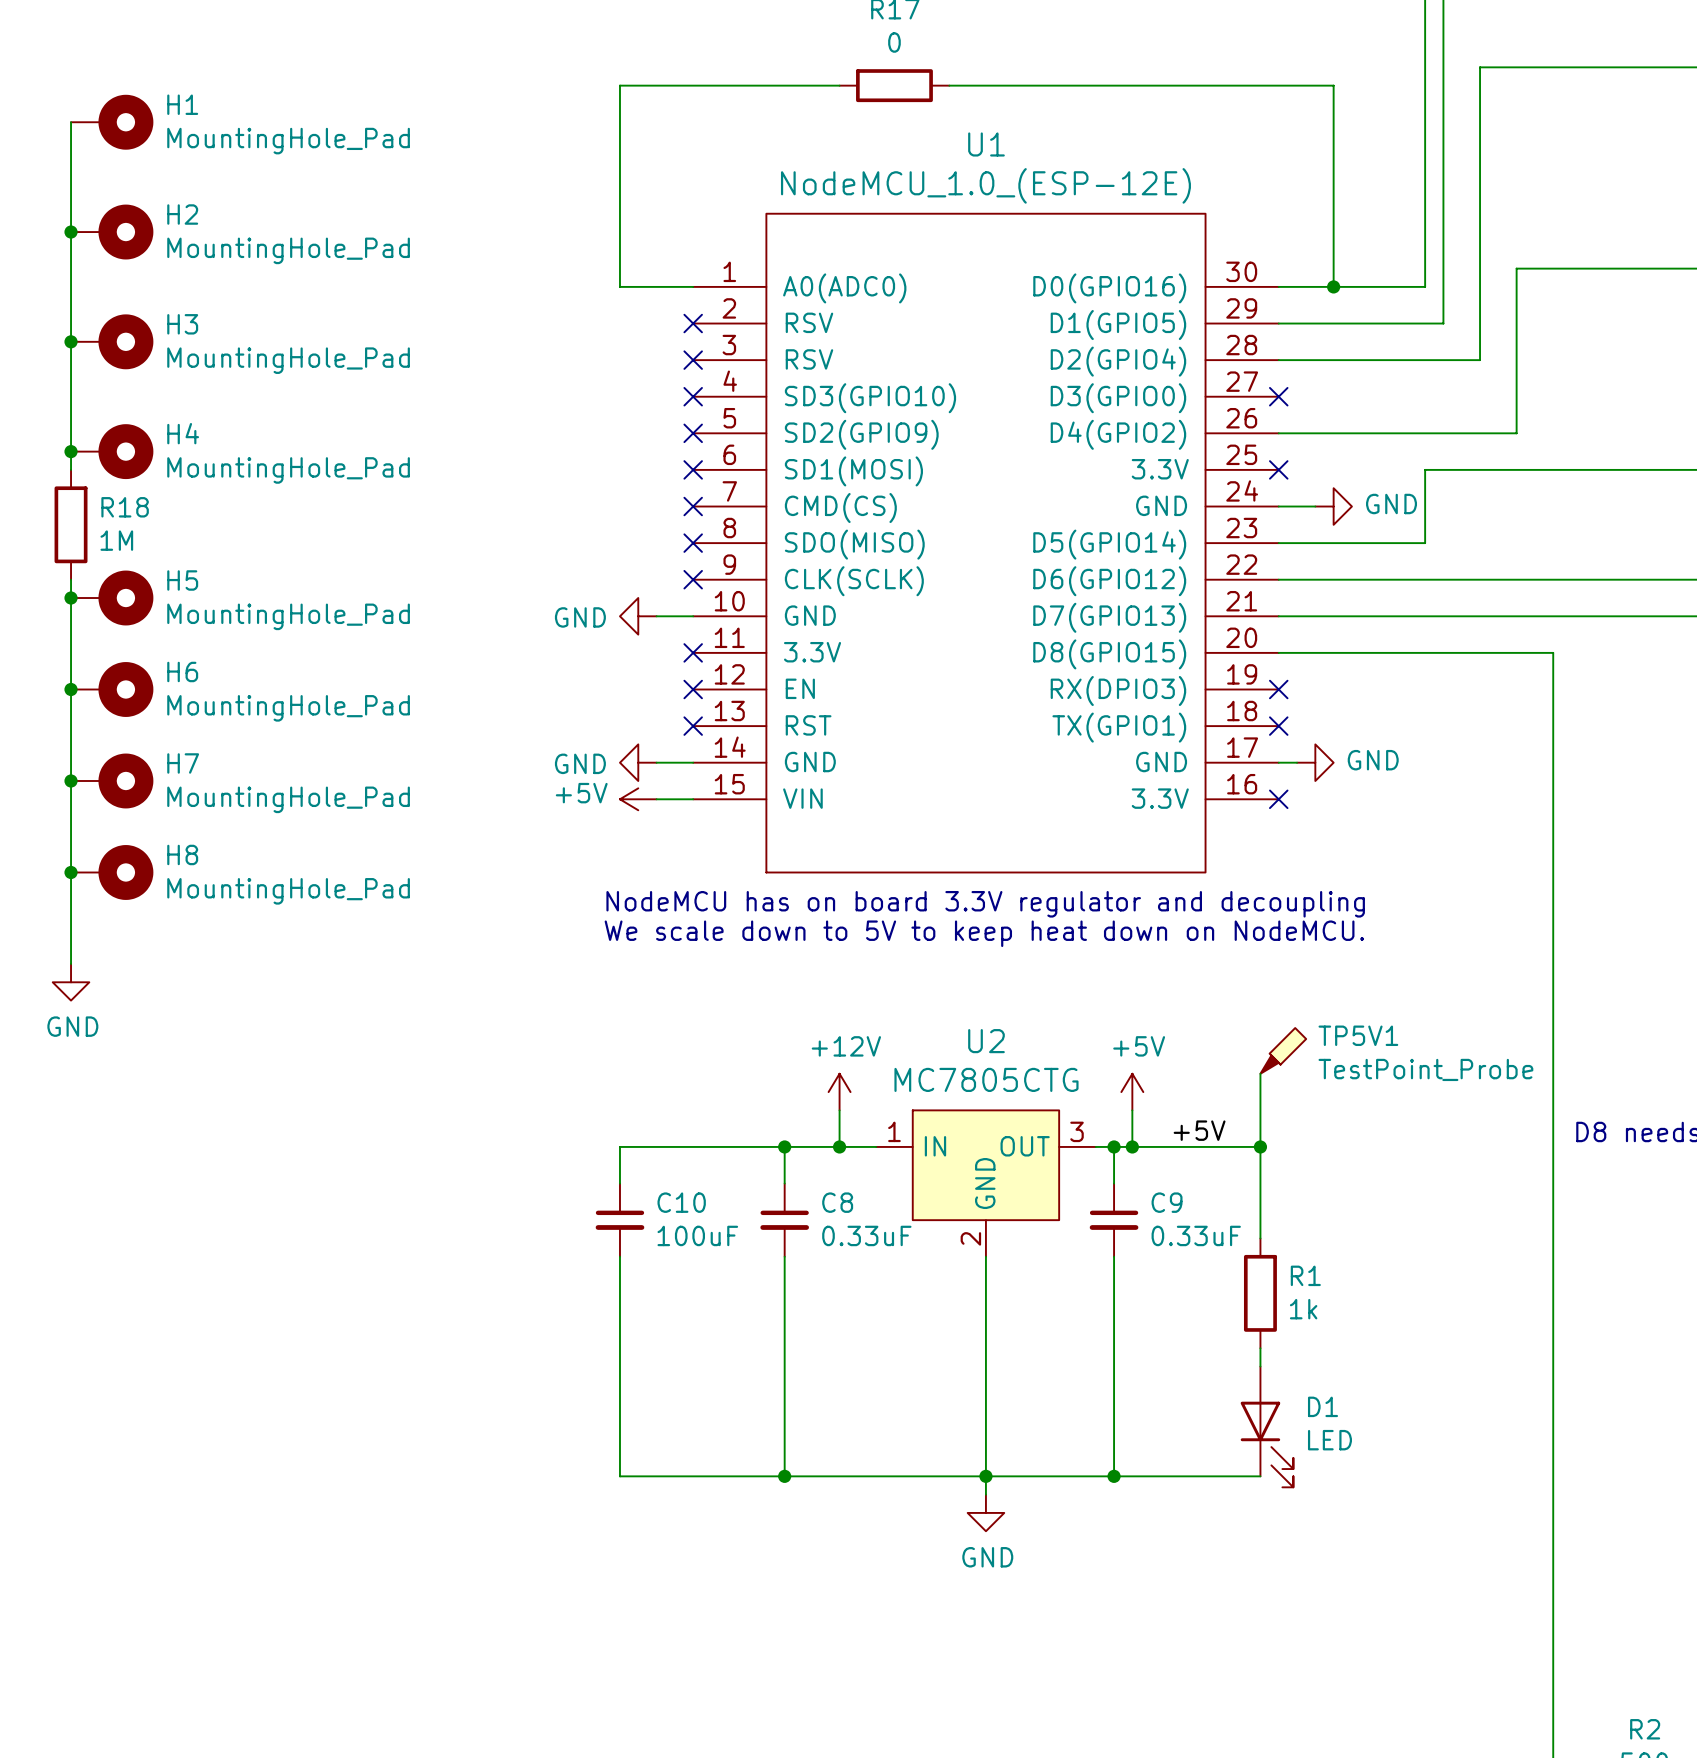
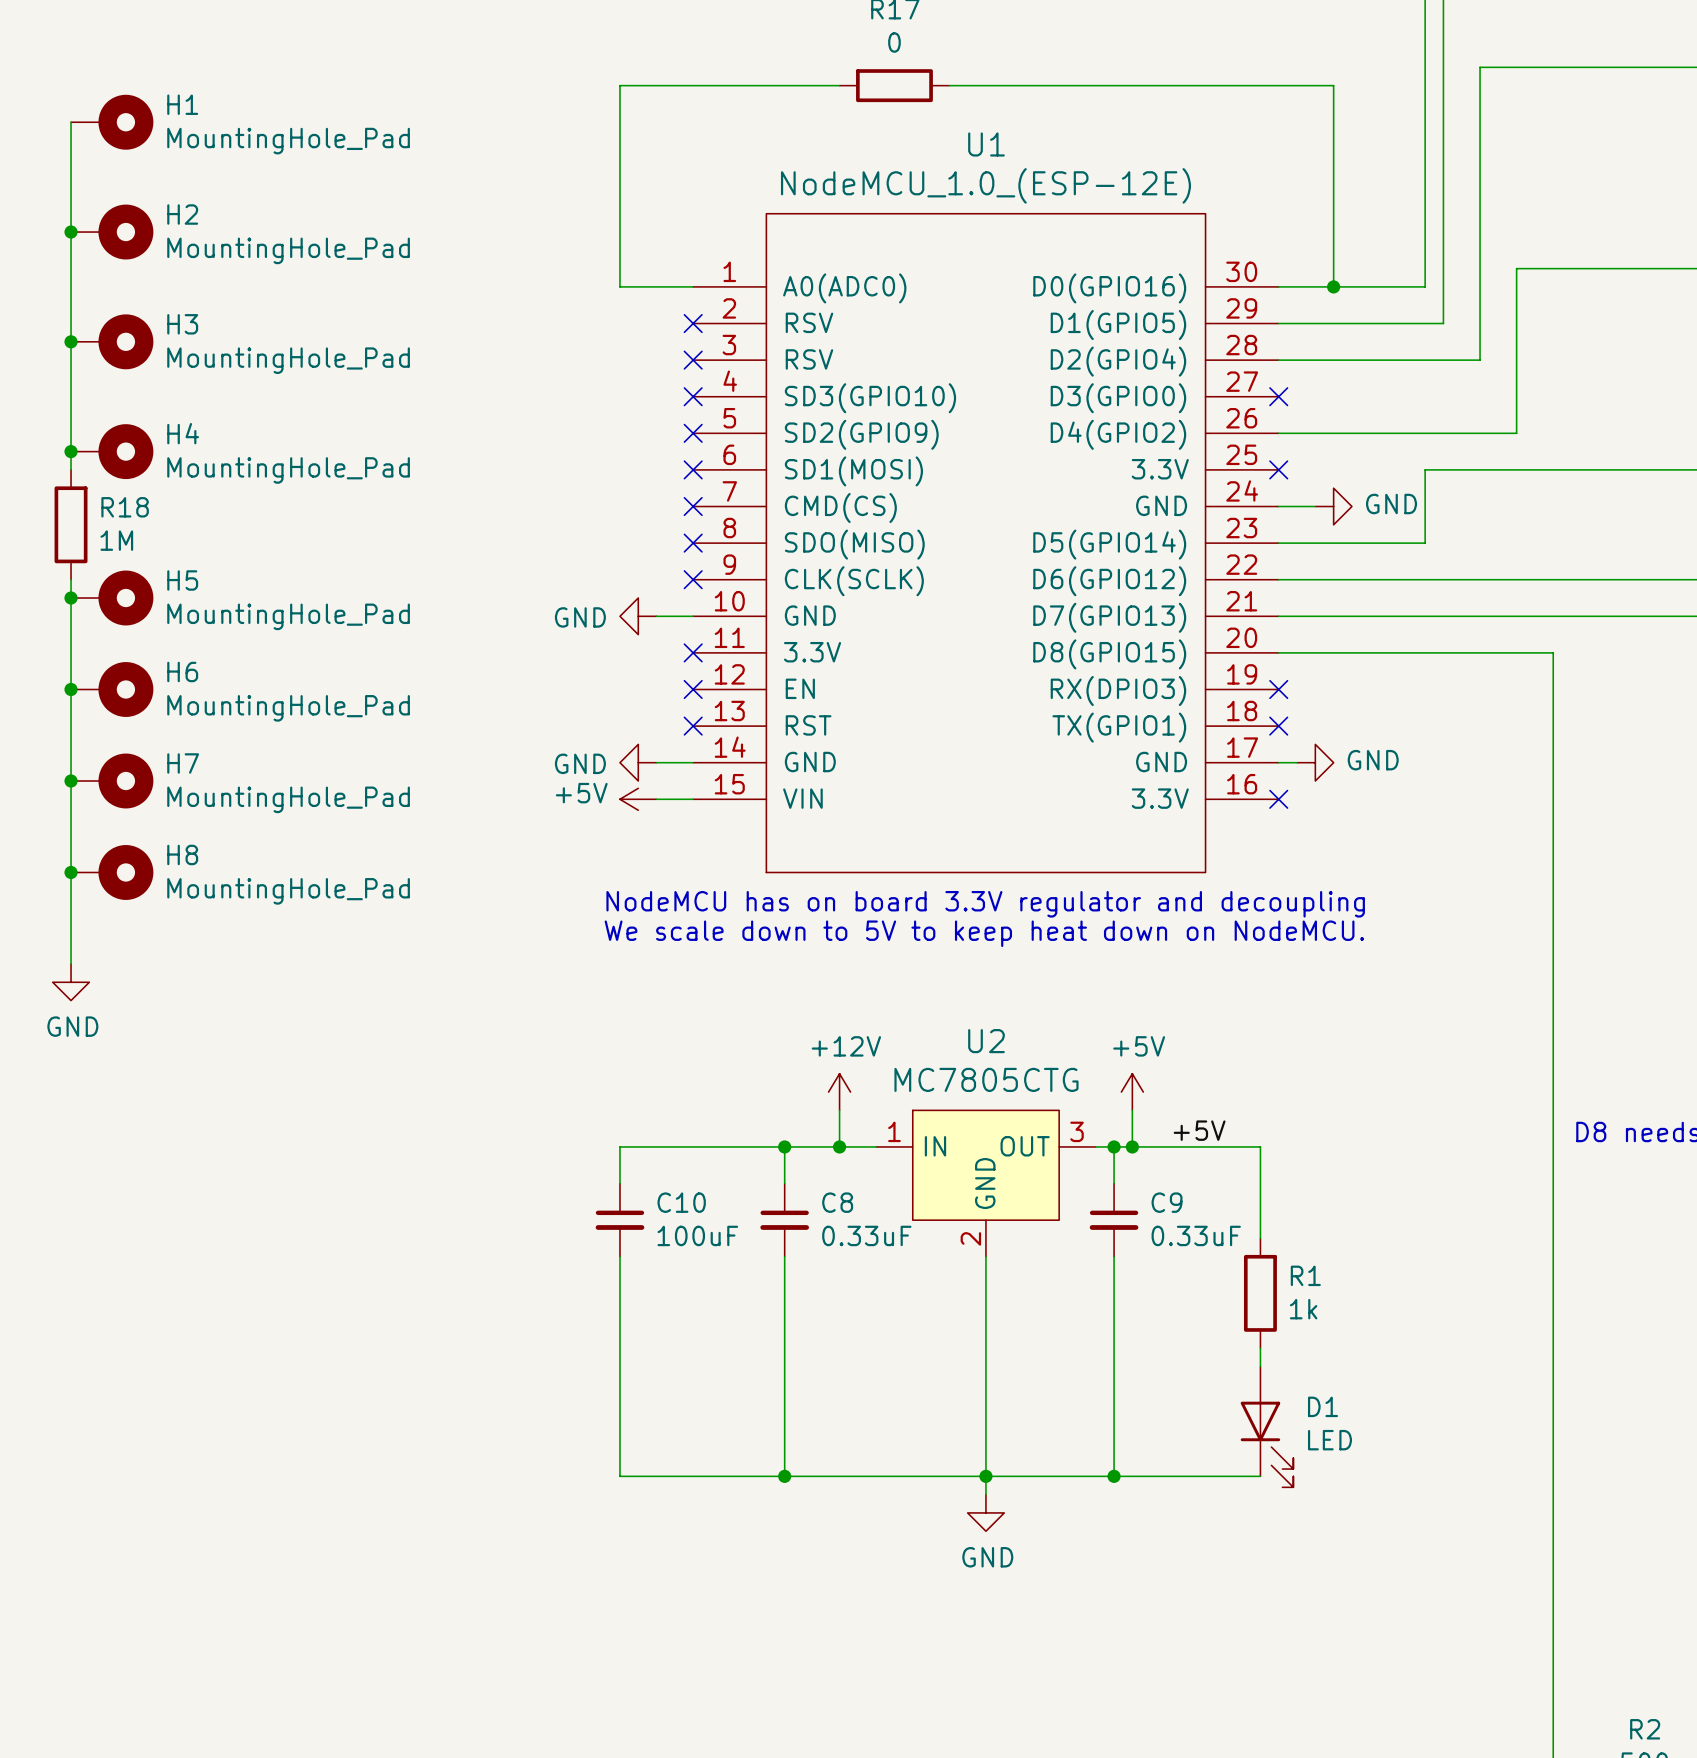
TP5V1: TestPoint_Probe (1283, 1050) -> none
wire: (1260, 1073) (1260, 1146) -> none
junction: (1260, 1146) -> none

